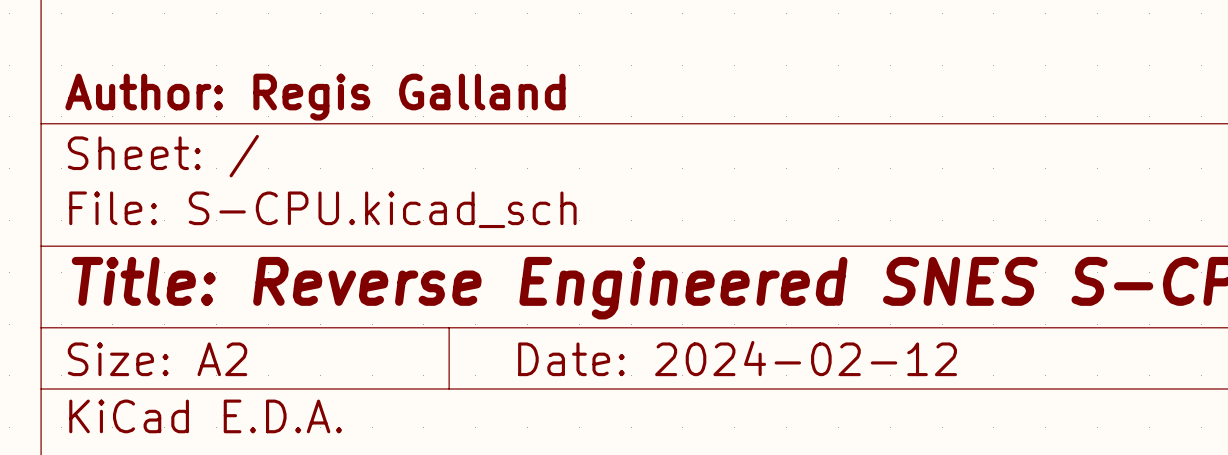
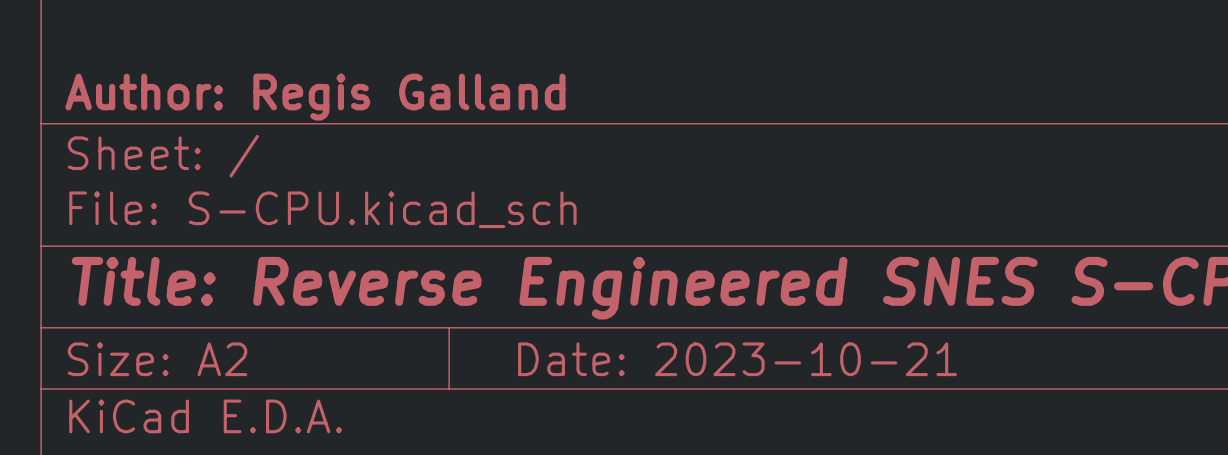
title block: Date: 2024-02-12 (737, 358) -> Date: 2023-10-21 (737, 359)

